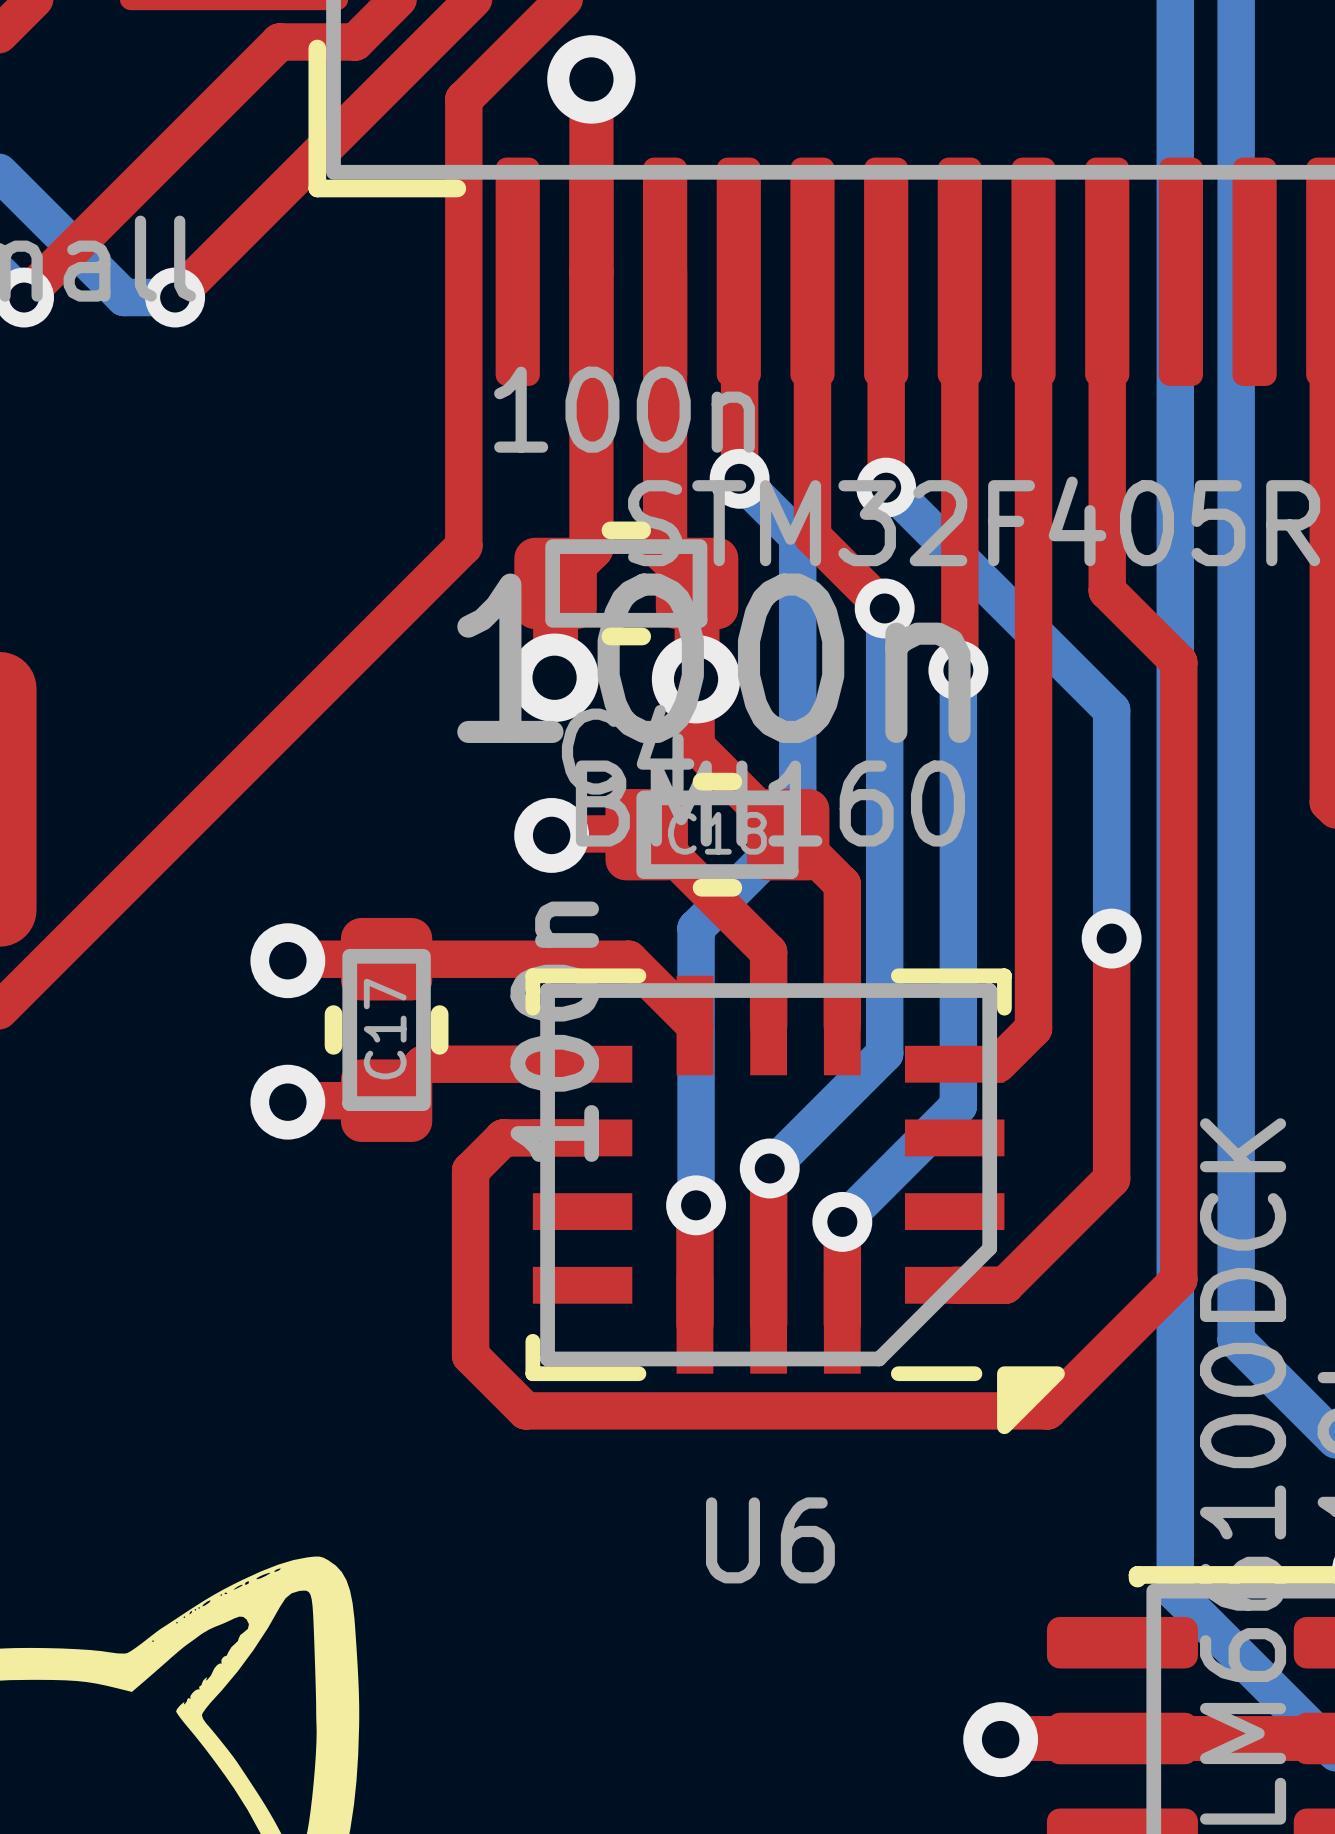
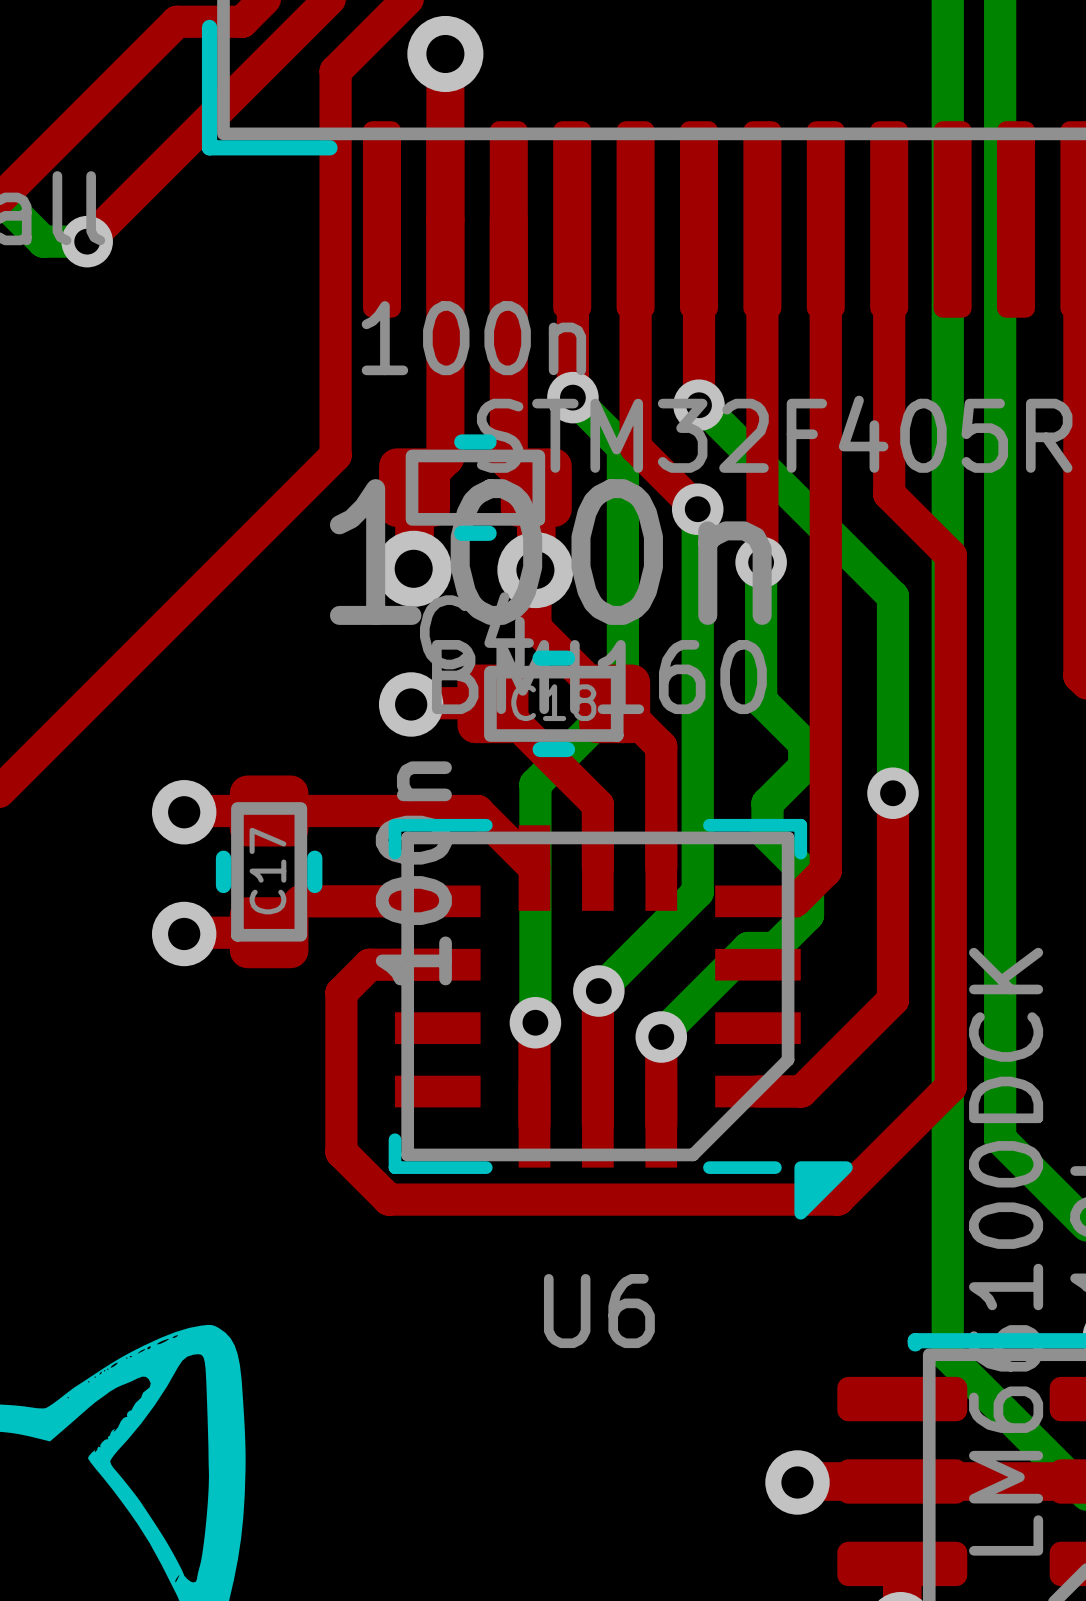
bottom track: (958, 831) (958, 1105) (842, 1221) -> (761, 700) (804, 743) (804, 766) (767, 803) (767, 835) (808, 875) (808, 914) (775, 947) (748, 947) (661, 1035)

